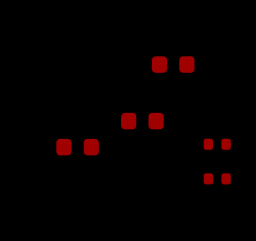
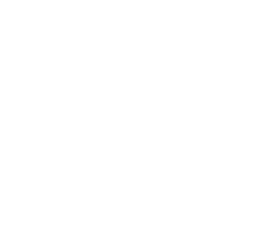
part: (173, 64) -> none
part: (142, 121) -> none
part: (217, 144) -> none
part: (77, 147) -> none
part: (217, 178) -> none

